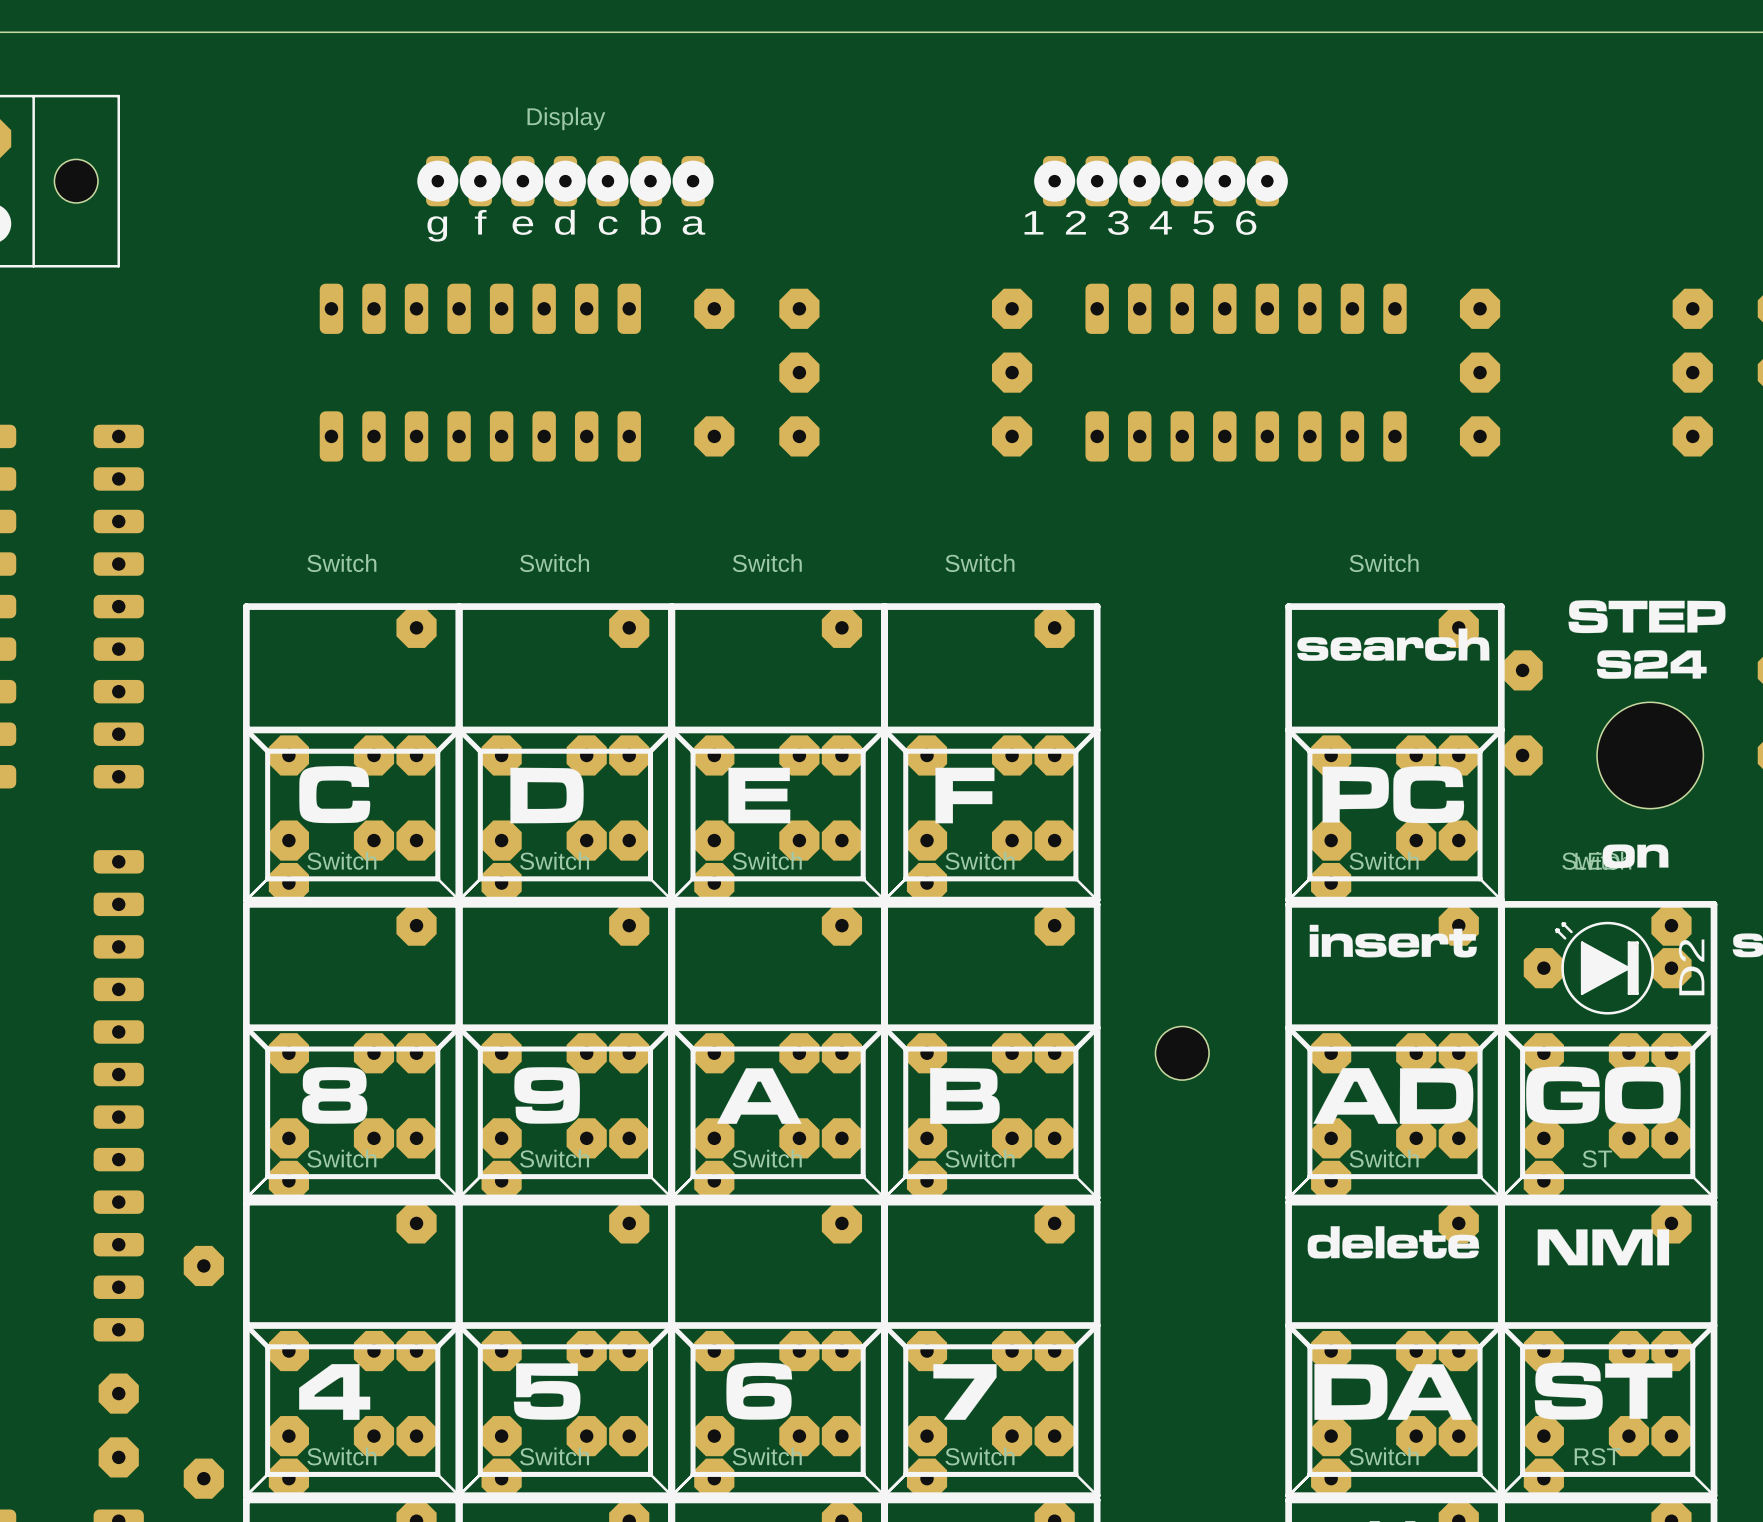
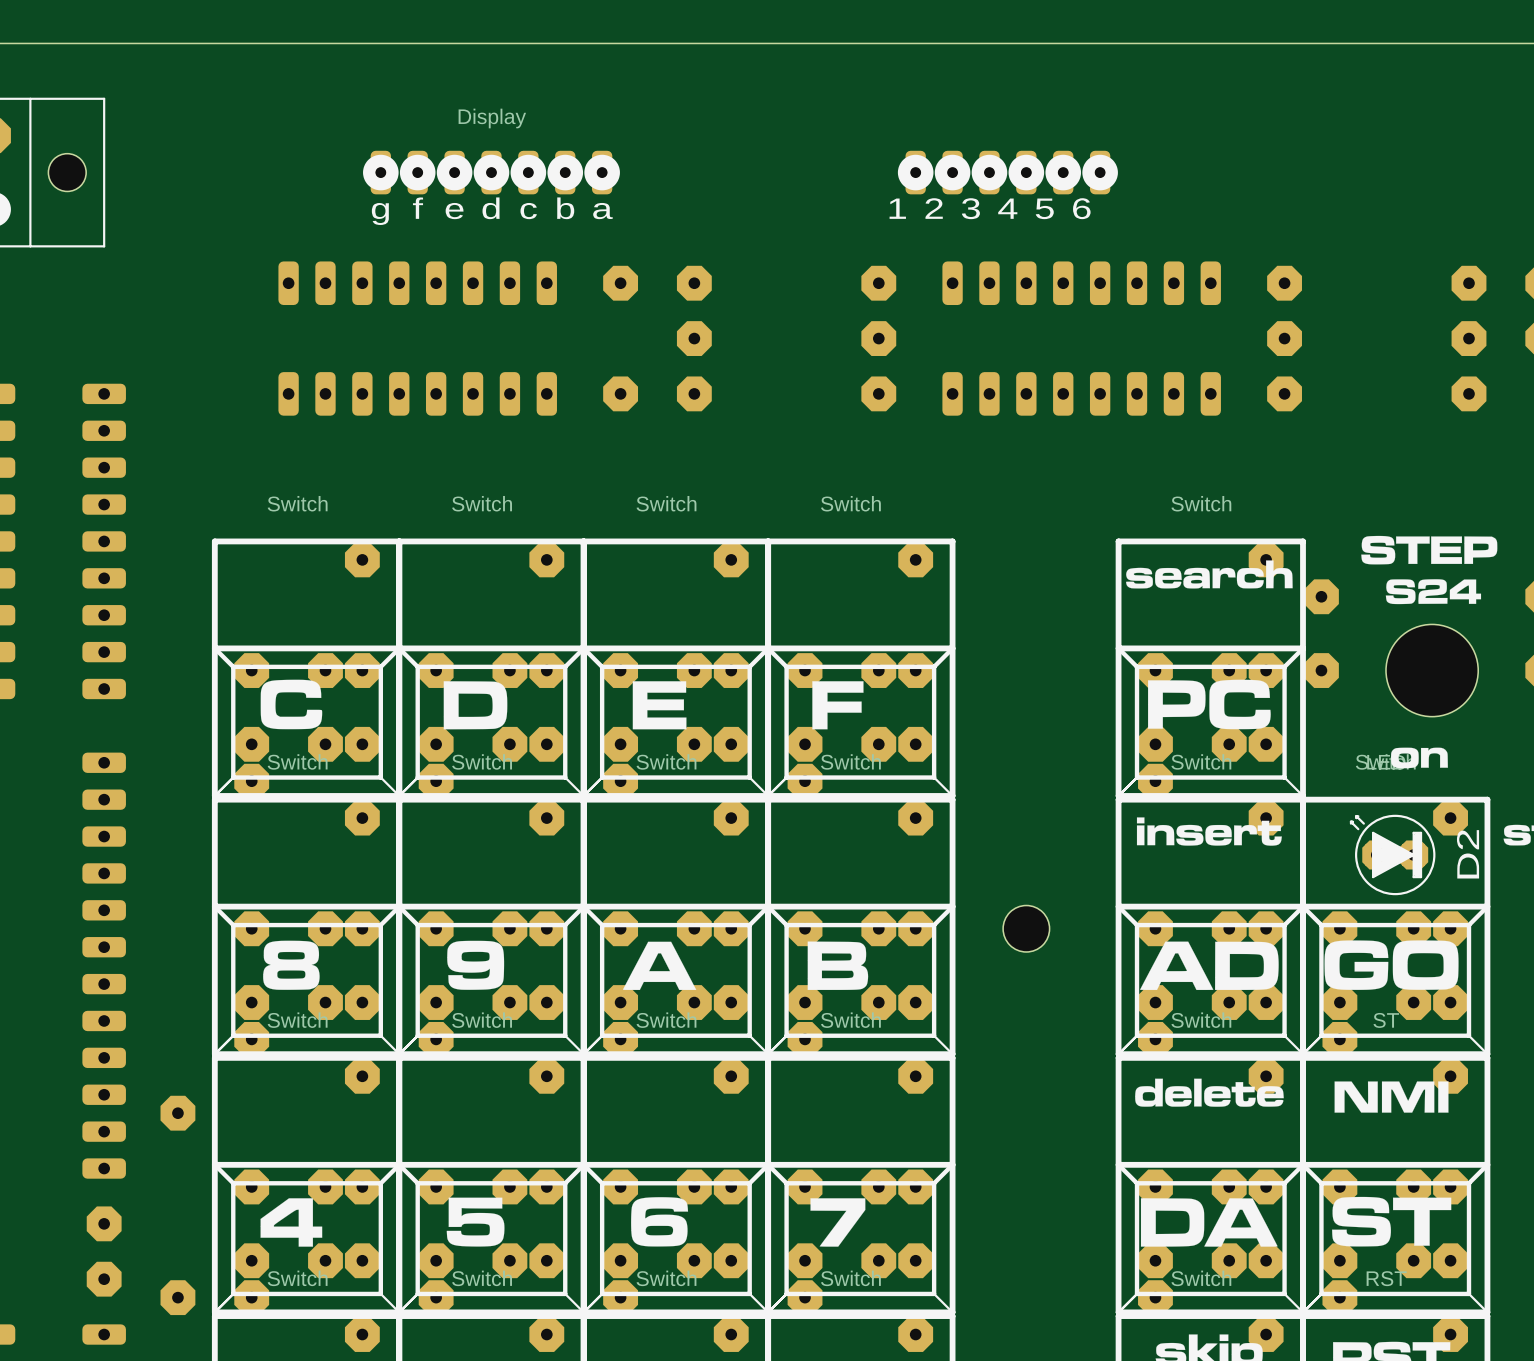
D2 footprint: [1523, 921, 1692, 1015] -> [1349, 814, 1436, 896]

